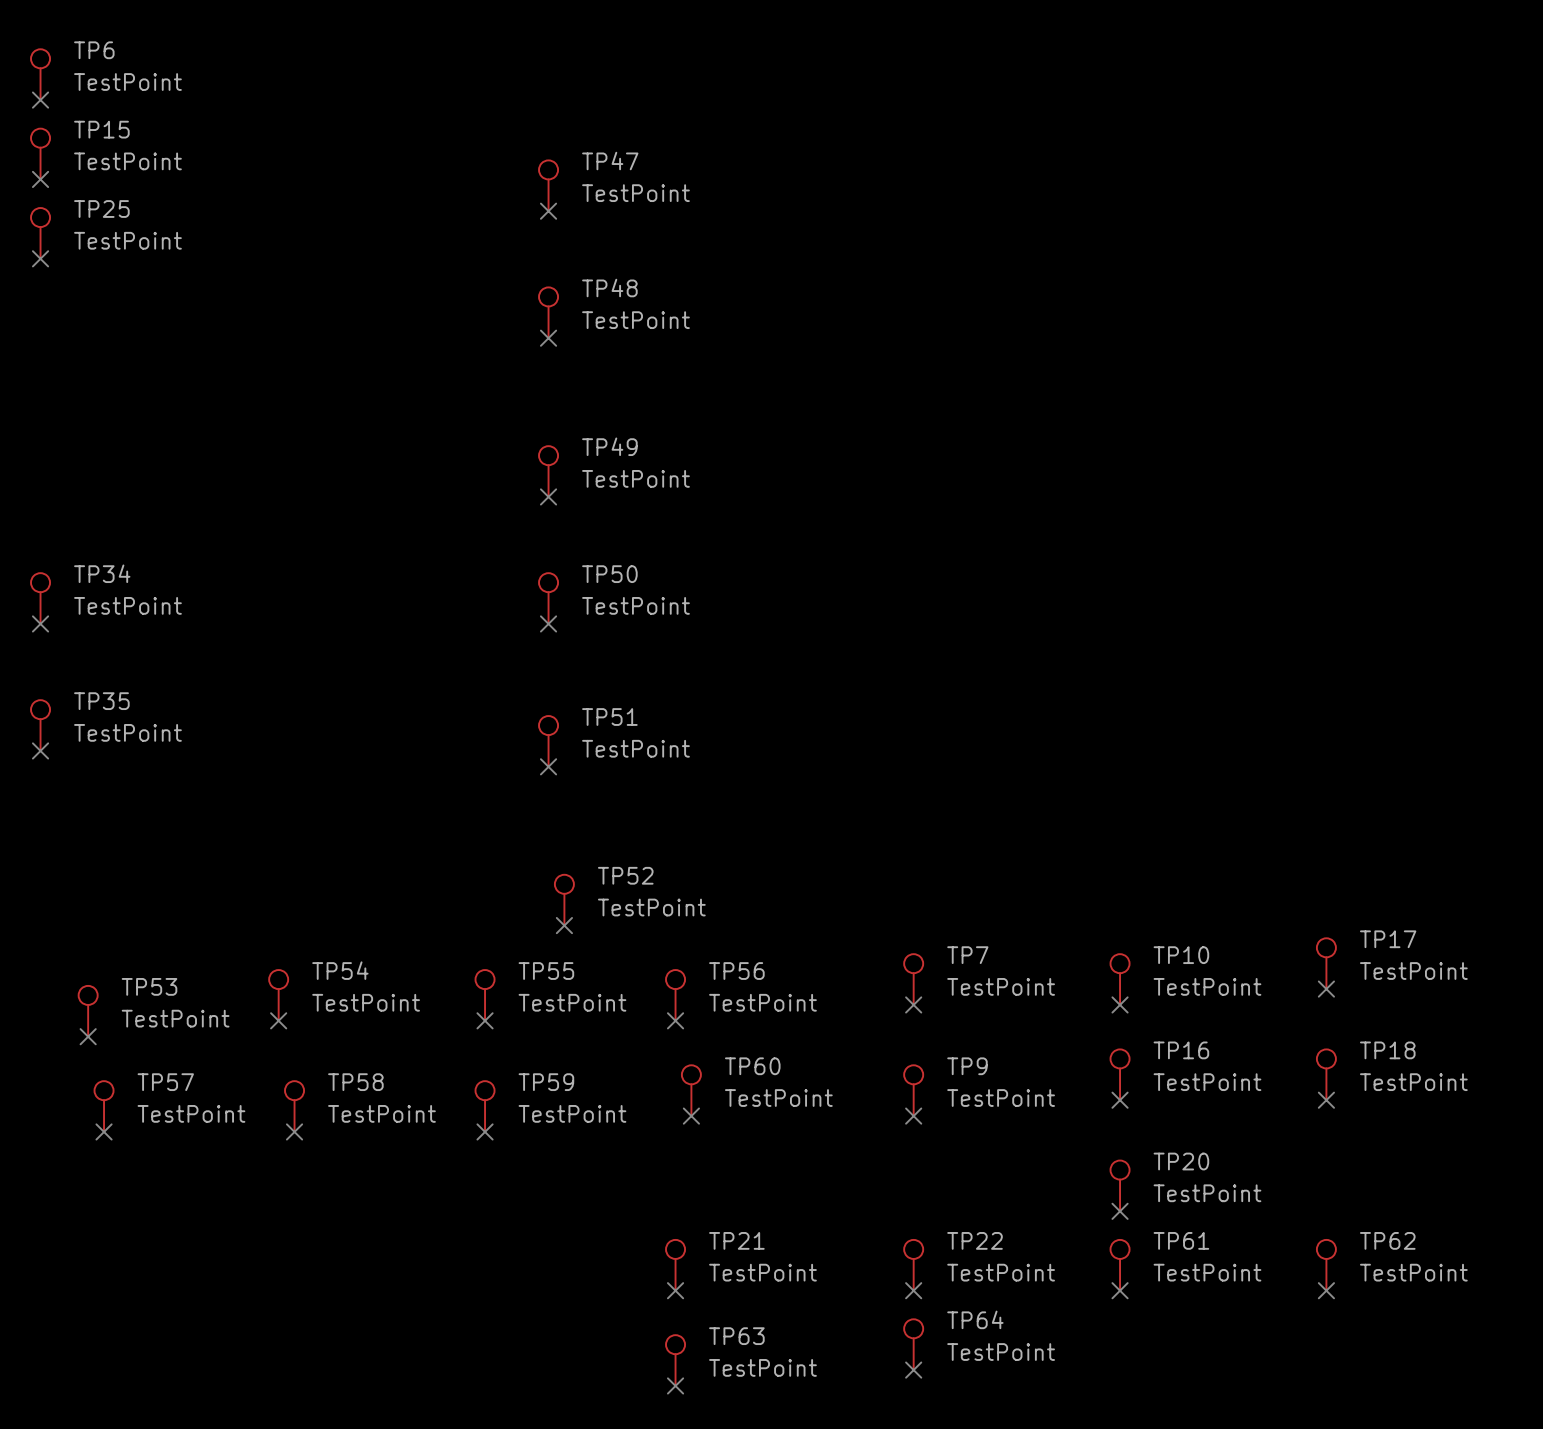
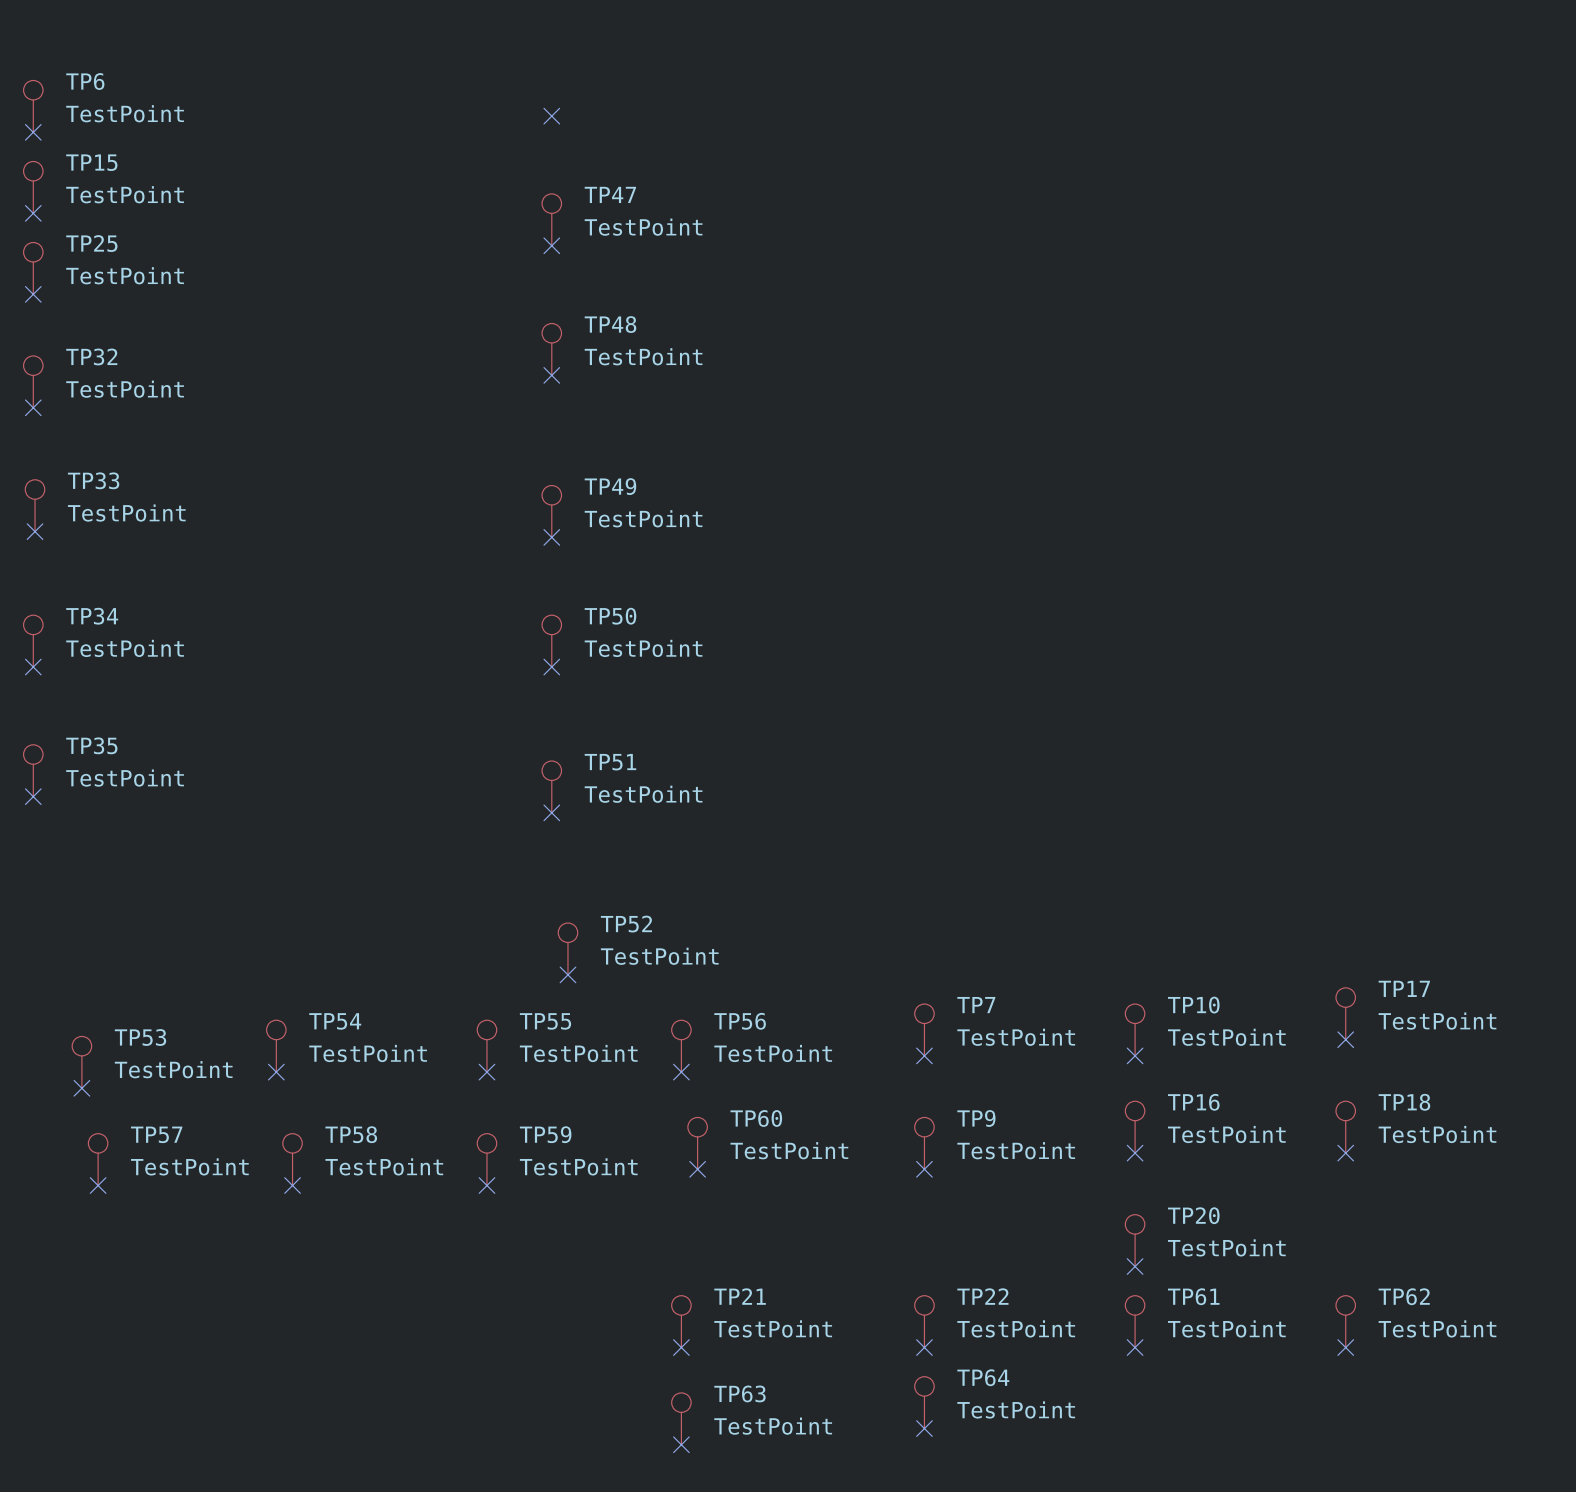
no-connect mark: none -> (551, 116)
TP32: none -> TestPoint (33, 381)
no-connect mark: none -> (33, 407)
TP33: none -> TestPoint (35, 505)
no-connect mark: none -> (35, 531)

